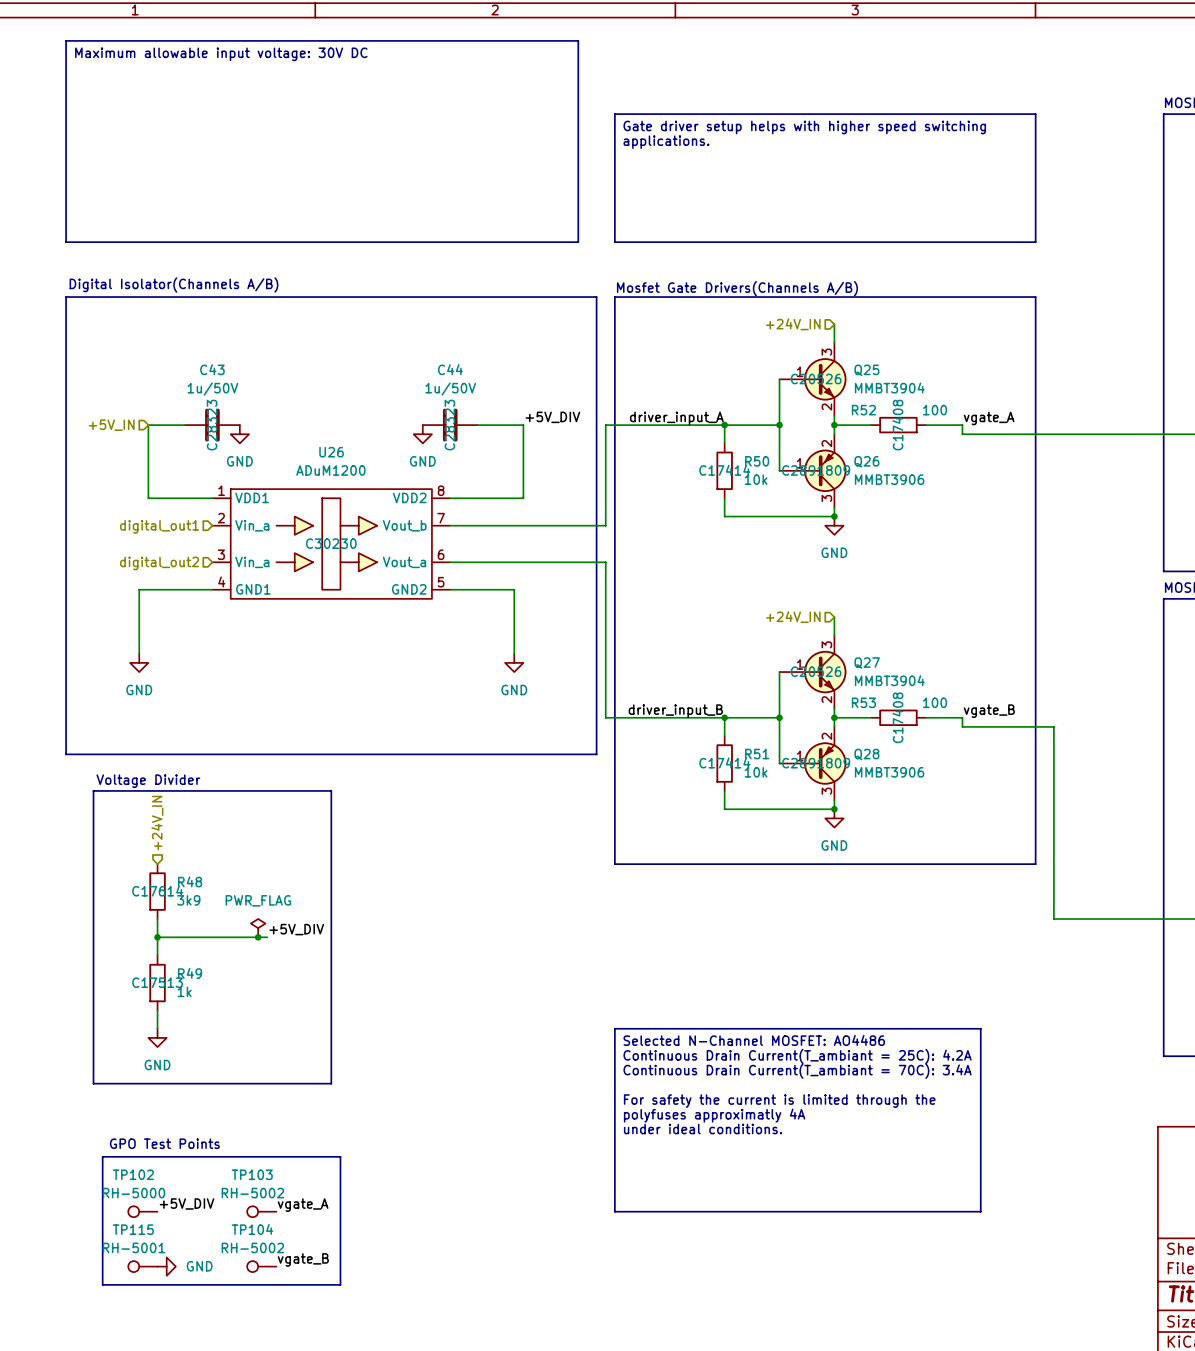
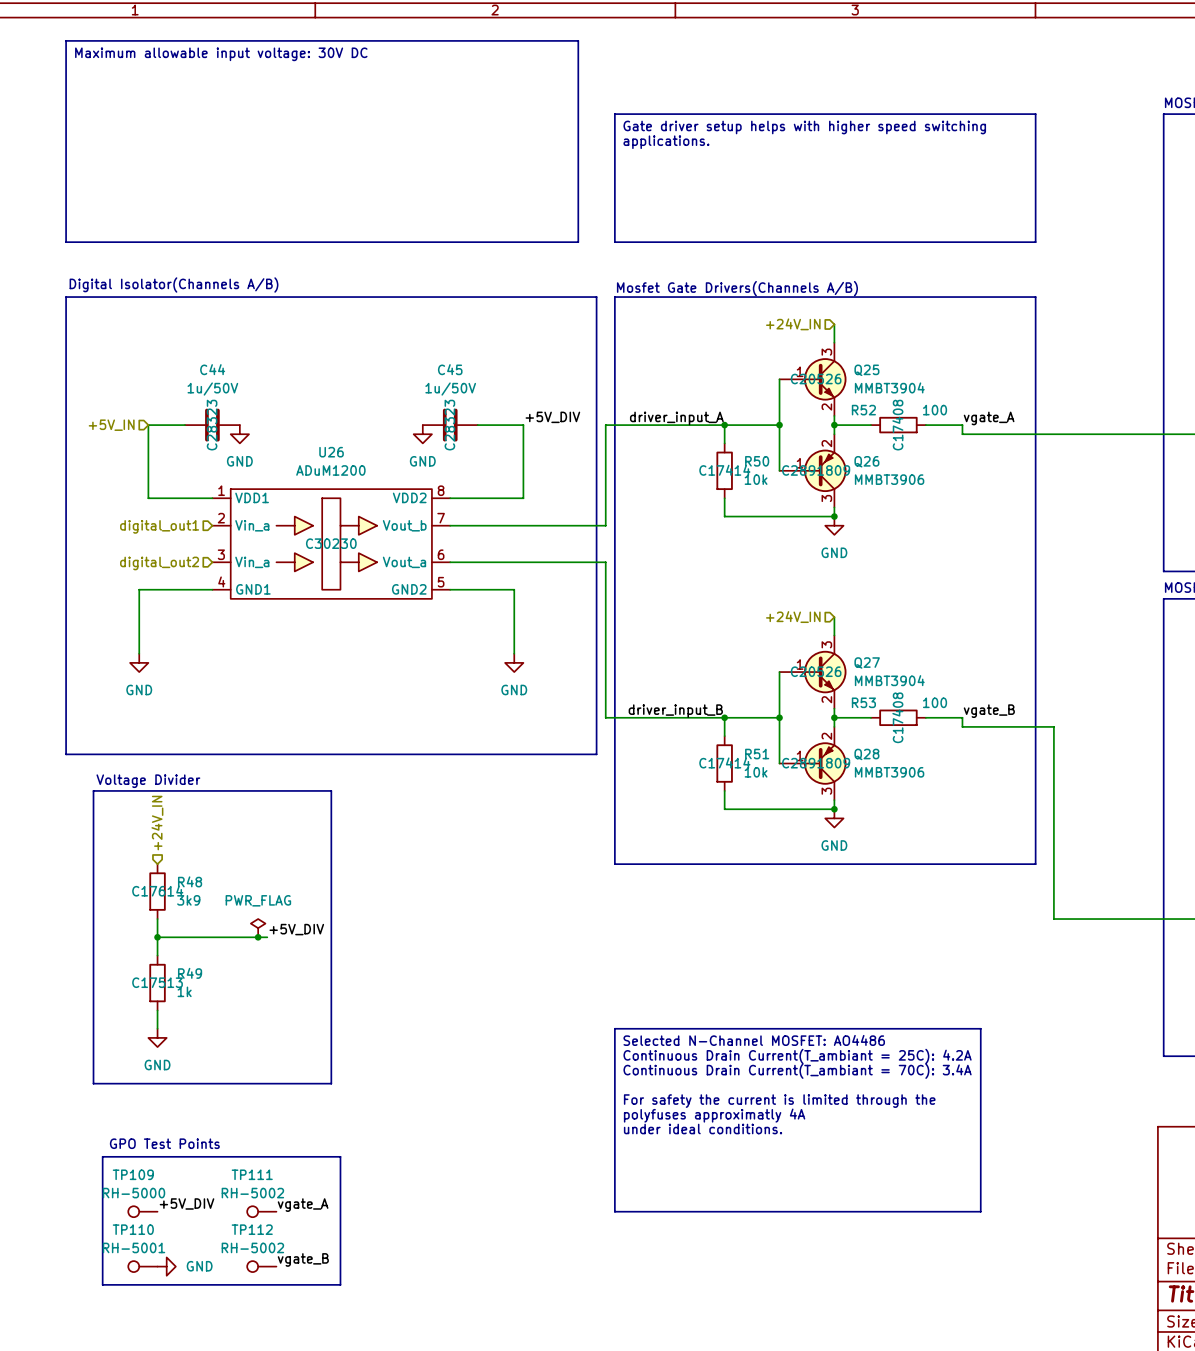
C43 name: C43 (212, 369) -> C44 (212, 369)
C44 name: C44 (450, 369) -> C45 (450, 369)
TP102 name: TP102 (133, 1174) -> TP109 (133, 1174)
TP103 name: TP103 (252, 1174) -> TP111 (252, 1174)
TP115 name: TP115 (133, 1229) -> TP110 (133, 1229)
TP104 name: TP104 (252, 1229) -> TP112 (252, 1229)

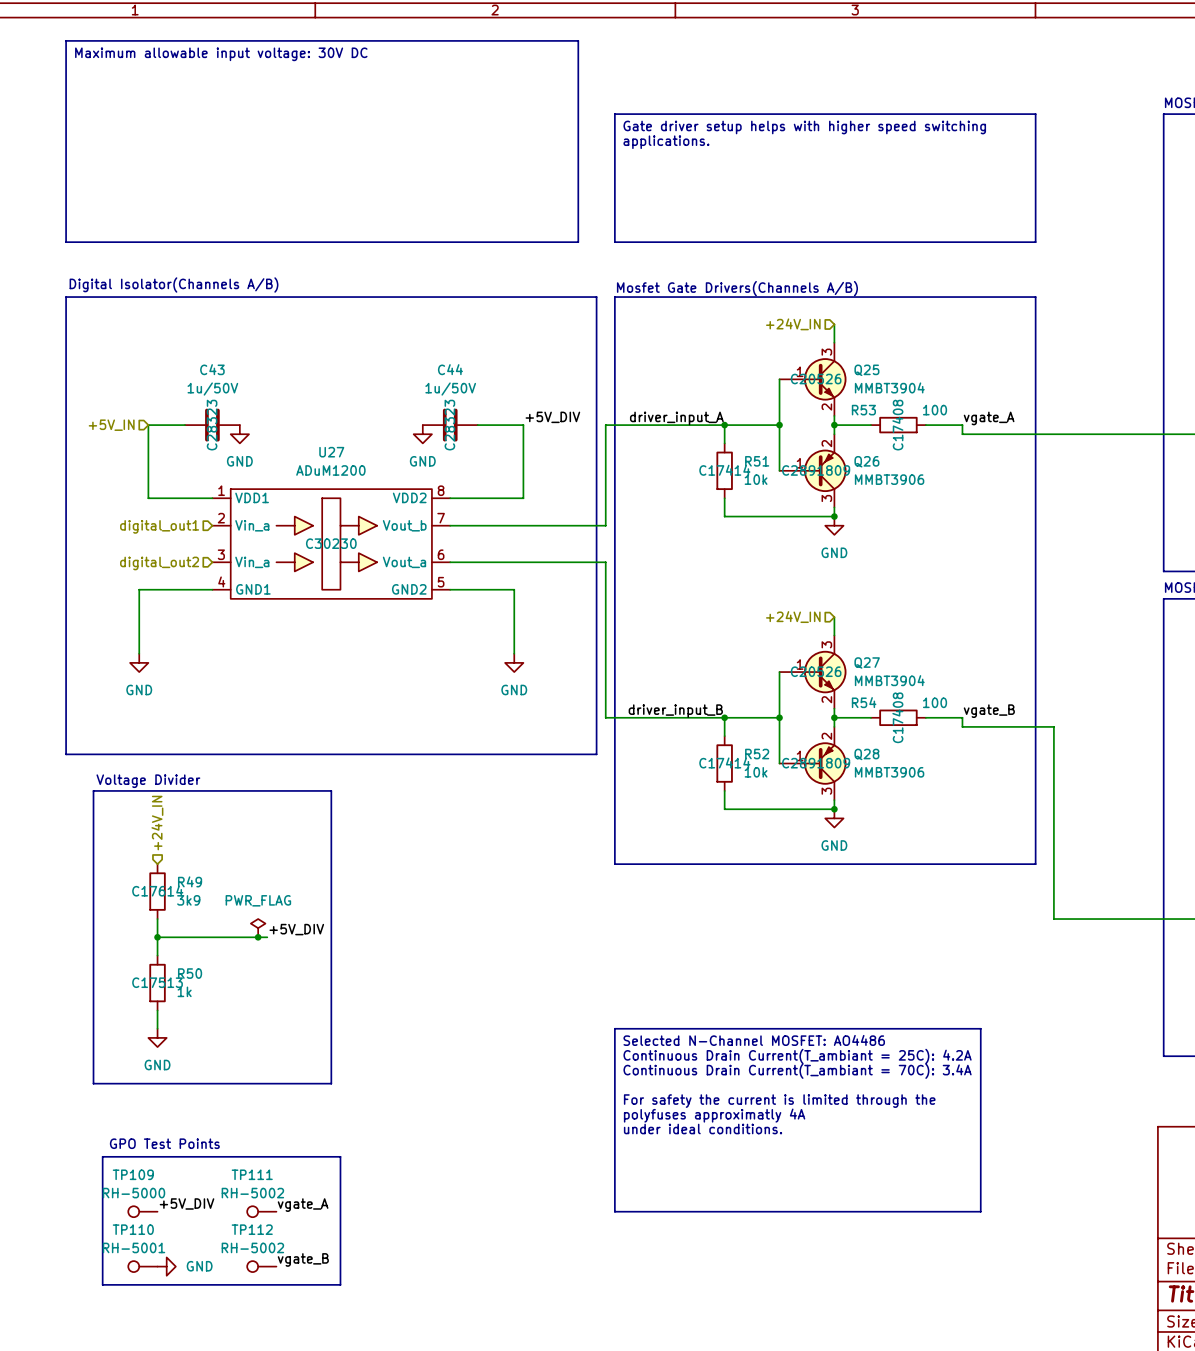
C44 name: C44 (212, 369) -> C43 (212, 369)
C45 name: C45 (450, 369) -> C44 (450, 369)
R52 name: R52 (863, 410) -> R53 (863, 410)
U26 name: U26 (331, 452) -> U27 (331, 452)
R50 name: R50 (757, 461) -> R51 (757, 461)
R53 name: R53 (863, 702) -> R54 (864, 702)
R51 name: R51 (757, 754) -> R52 (757, 754)
R48 name: R48 (190, 881) -> R49 (190, 881)
R49 name: R49 (190, 973) -> R50 (190, 973)

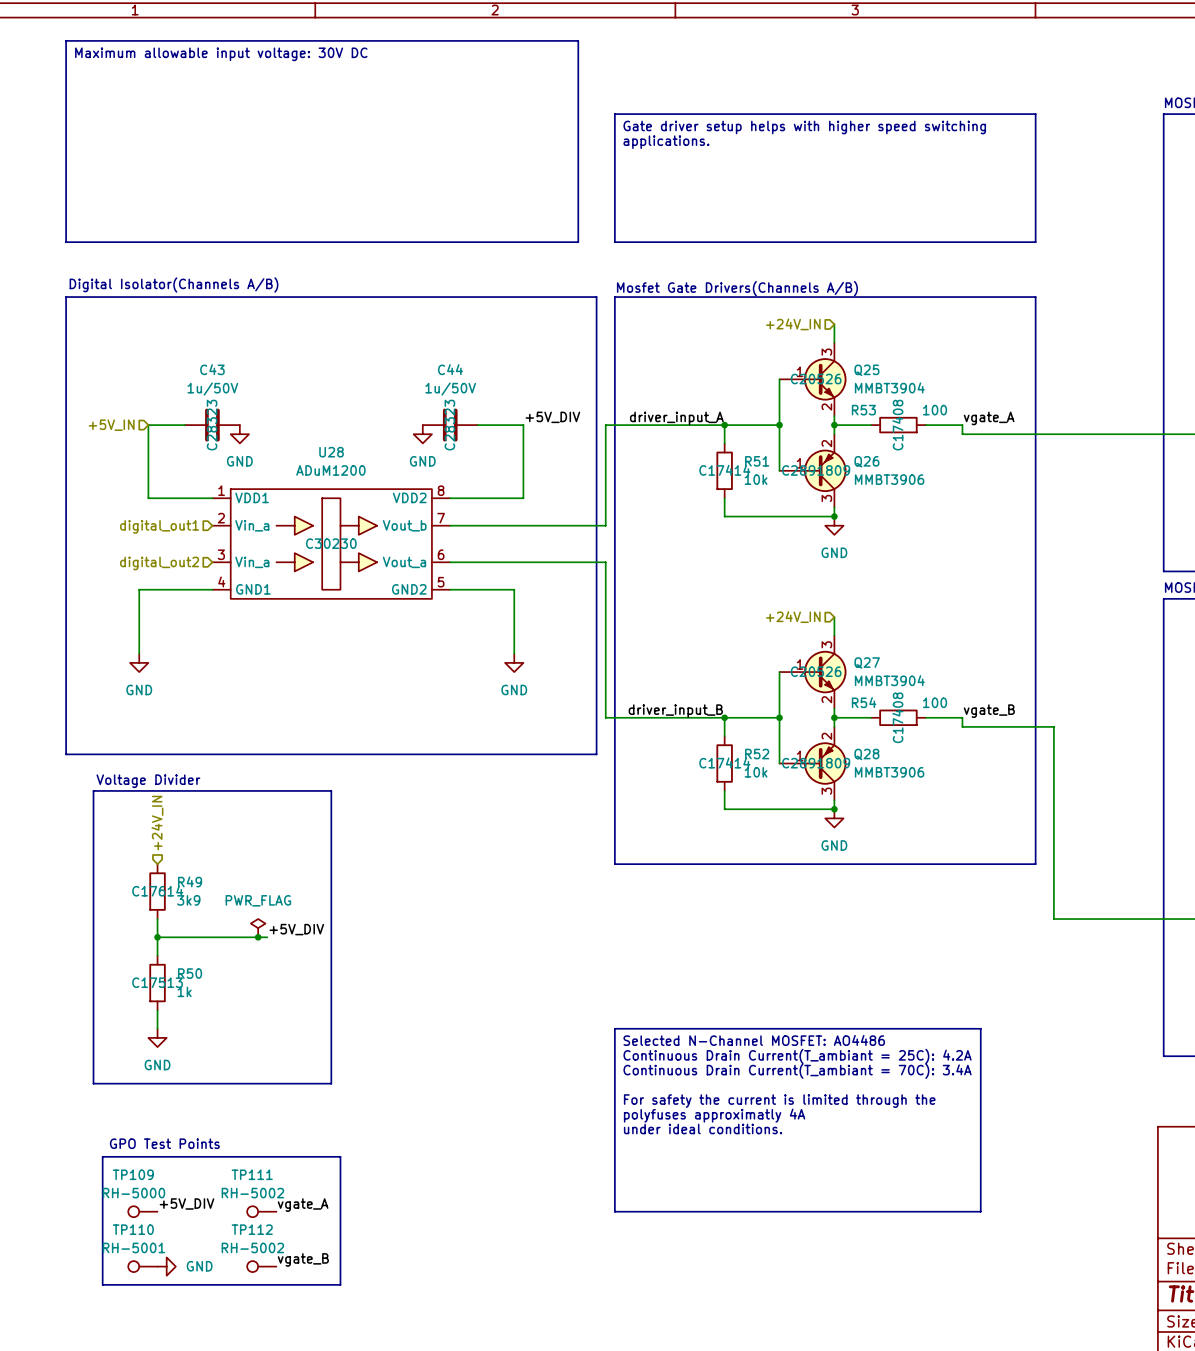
U27 name: U27 (331, 452) -> U28 (331, 452)

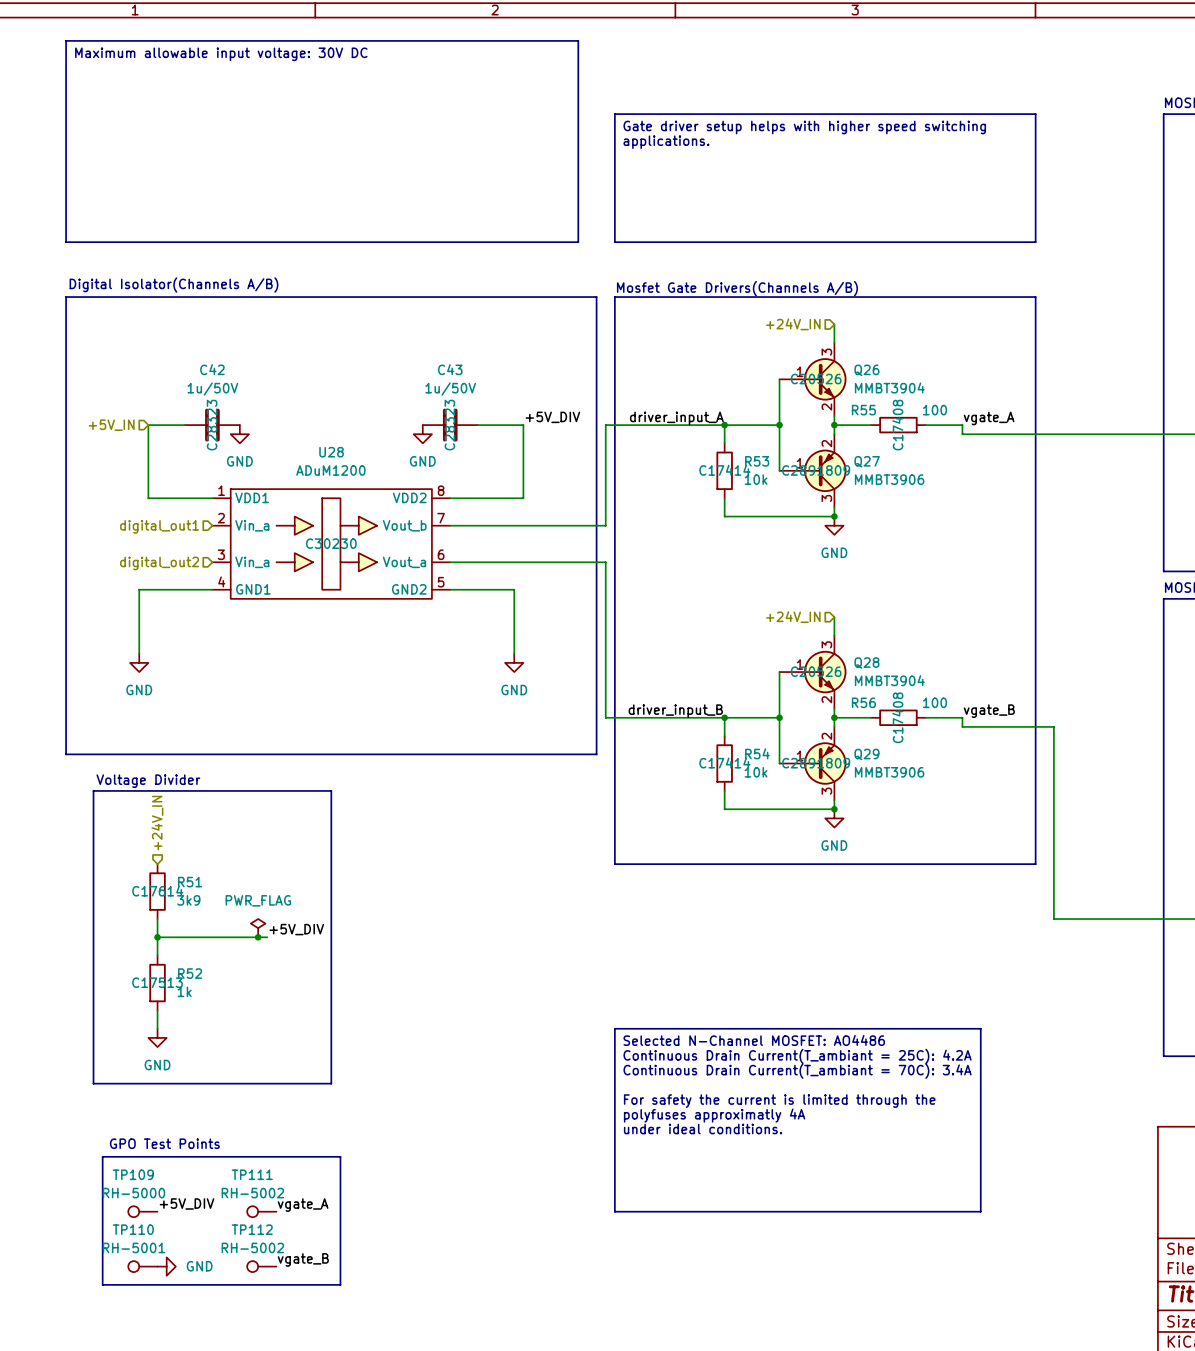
C43 name: C43 (212, 369) -> C42 (212, 369)
C44 name: C44 (450, 369) -> C43 (450, 369)
Q25 name: Q25 (866, 370) -> Q26 (866, 370)
R53 name: R53 (863, 410) -> R55 (863, 410)
R51 name: R51 (757, 461) -> R53 (757, 461)
Q26 name: Q26 (866, 461) -> Q27 (867, 461)
Q27 name: Q27 (867, 662) -> Q28 (866, 662)
R54 name: R54 (864, 702) -> R56 (863, 702)
R52 name: R52 (757, 754) -> R54 (757, 753)
Q28 name: Q28 (866, 754) -> Q29 (866, 754)
R49 name: R49 (190, 881) -> R51 (190, 882)
R50 name: R50 (190, 973) -> R52 (190, 973)

